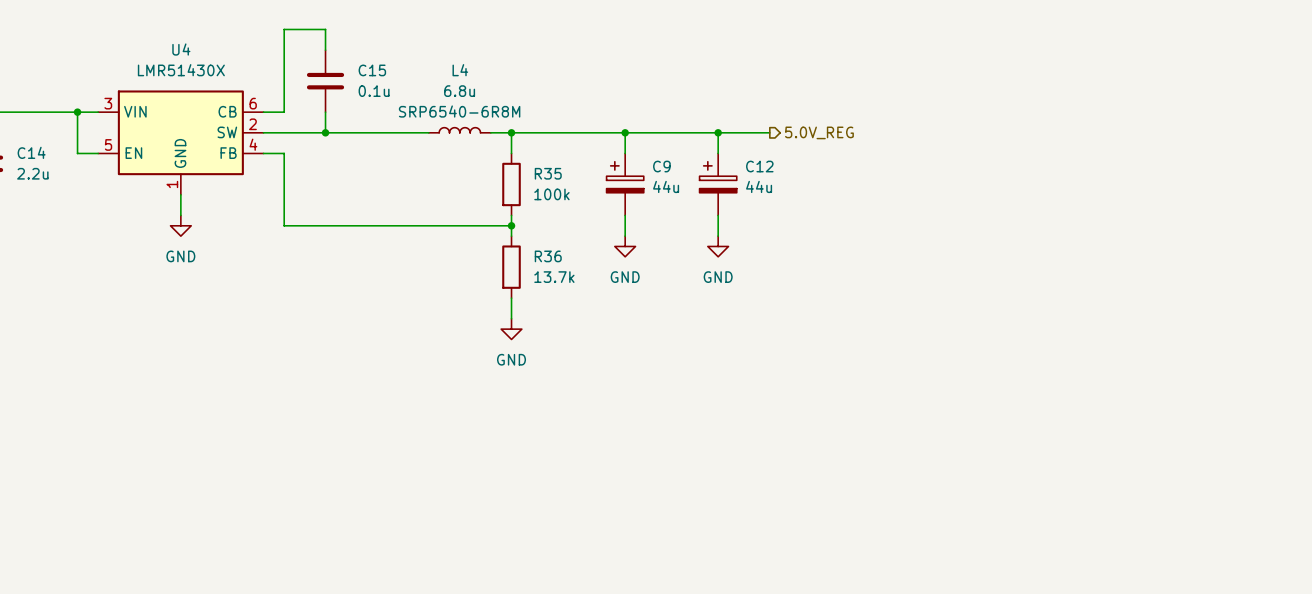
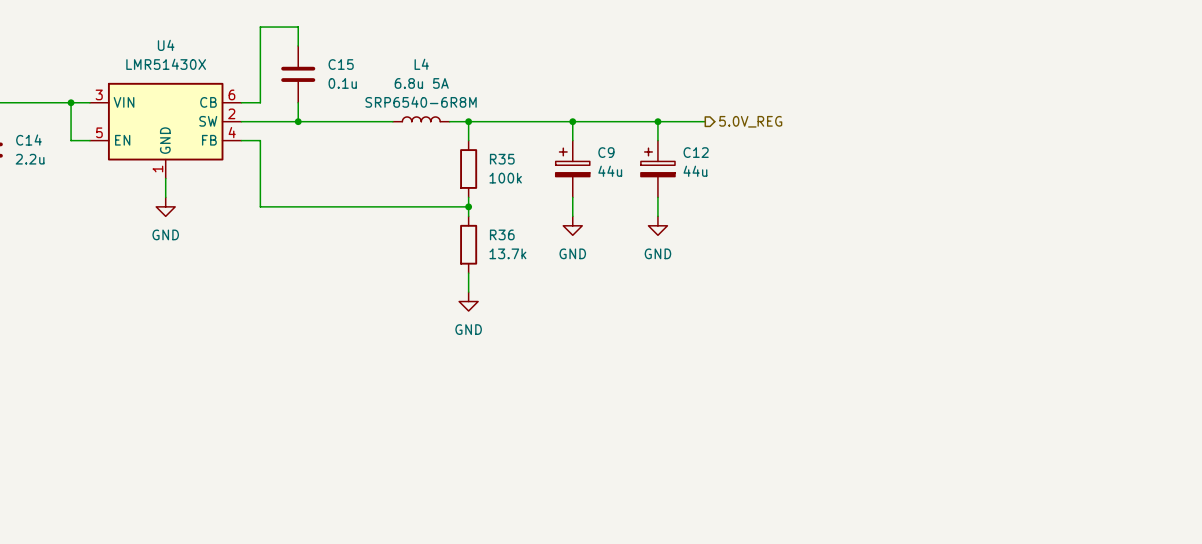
L4 value: 6.8u (459, 91) -> 6.8u 5A (421, 83)

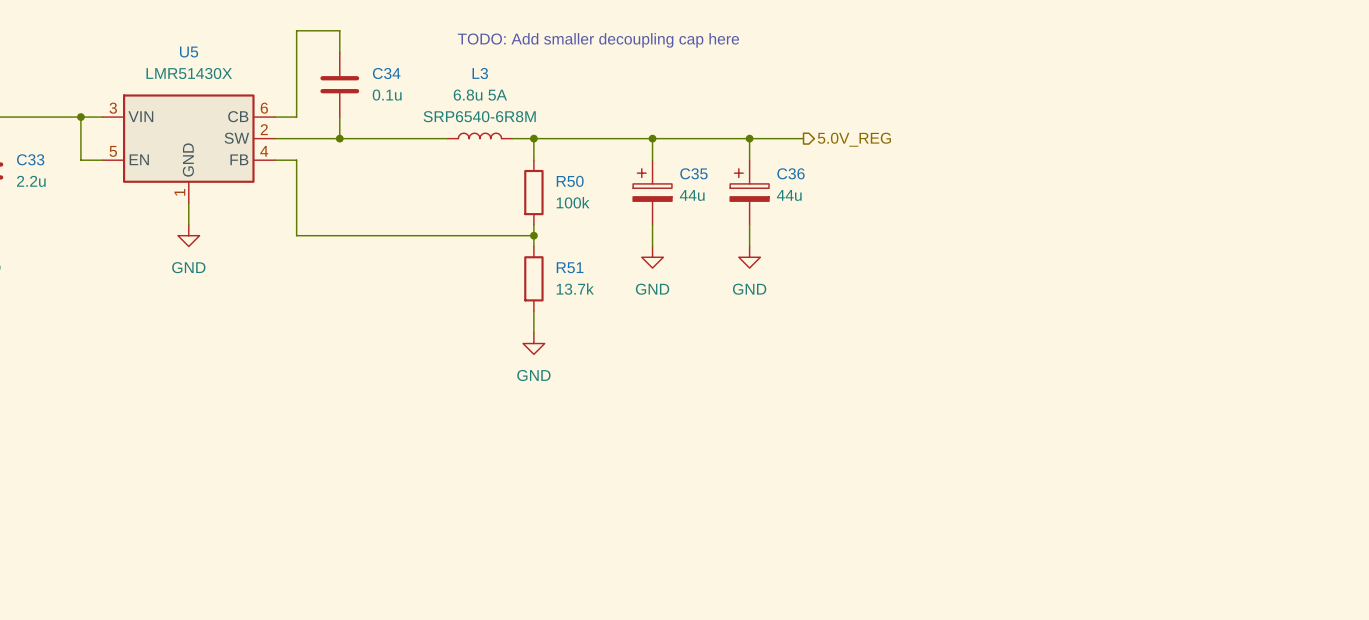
text: none -> TODO: Add smaller decoupling cap here (598, 40)
U4 name: U4 (166, 45) -> U5 (189, 52)
C15 name: C15 (341, 64) -> C34 (386, 73)
L4 name: L4 (421, 64) -> L3 (480, 73)
C14 name: C14 (28, 140) -> C33 (30, 159)
C9 name: C9 (606, 152) -> C35 (693, 173)
C12 name: C12 (696, 152) -> C36 (791, 173)
R35 name: R35 (502, 159) -> R50 (570, 181)
R36 name: R36 (502, 234) -> R51 (570, 267)

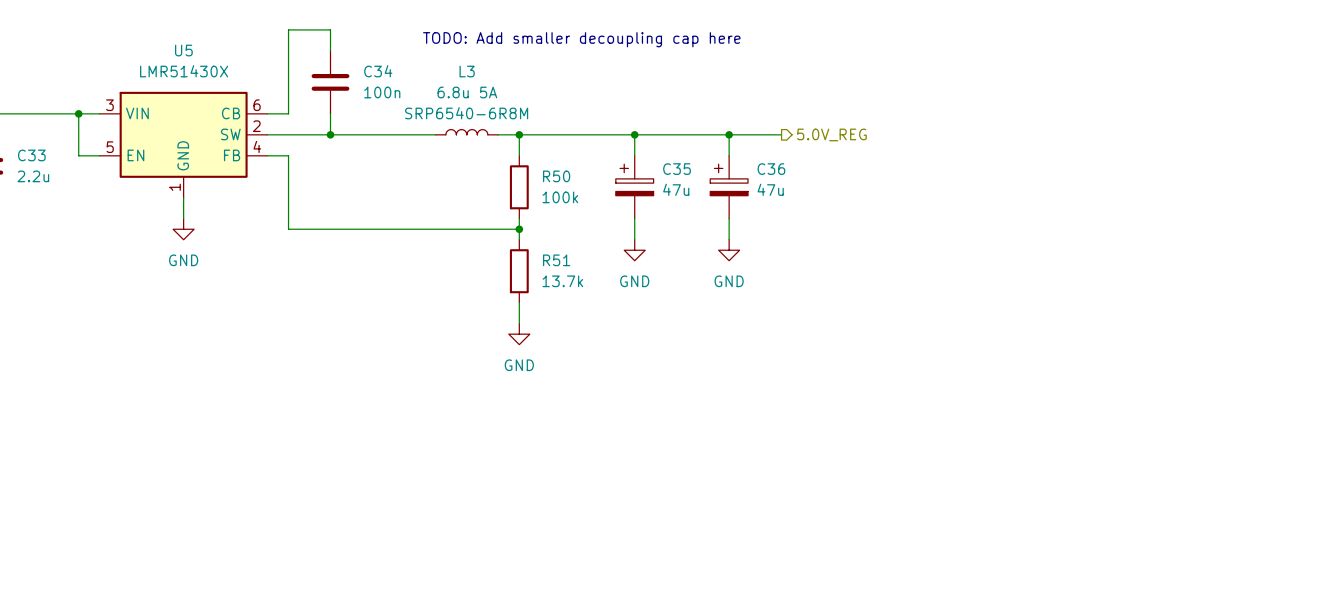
C34 value: 0.1u (387, 95) -> 100n (382, 92)
C35 value: 44u (692, 195) -> 47u (676, 189)
C36 value: 44u (789, 195) -> 47u (770, 189)

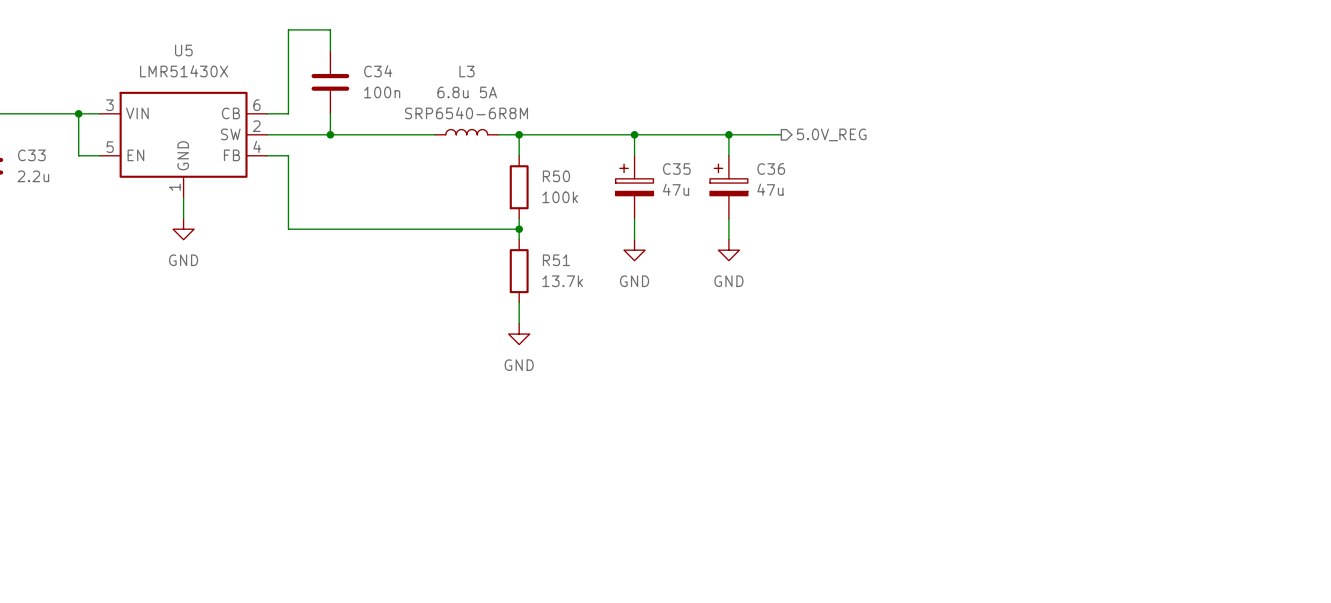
text: TODO: Add smaller decoupling cap here (581, 39) -> none

